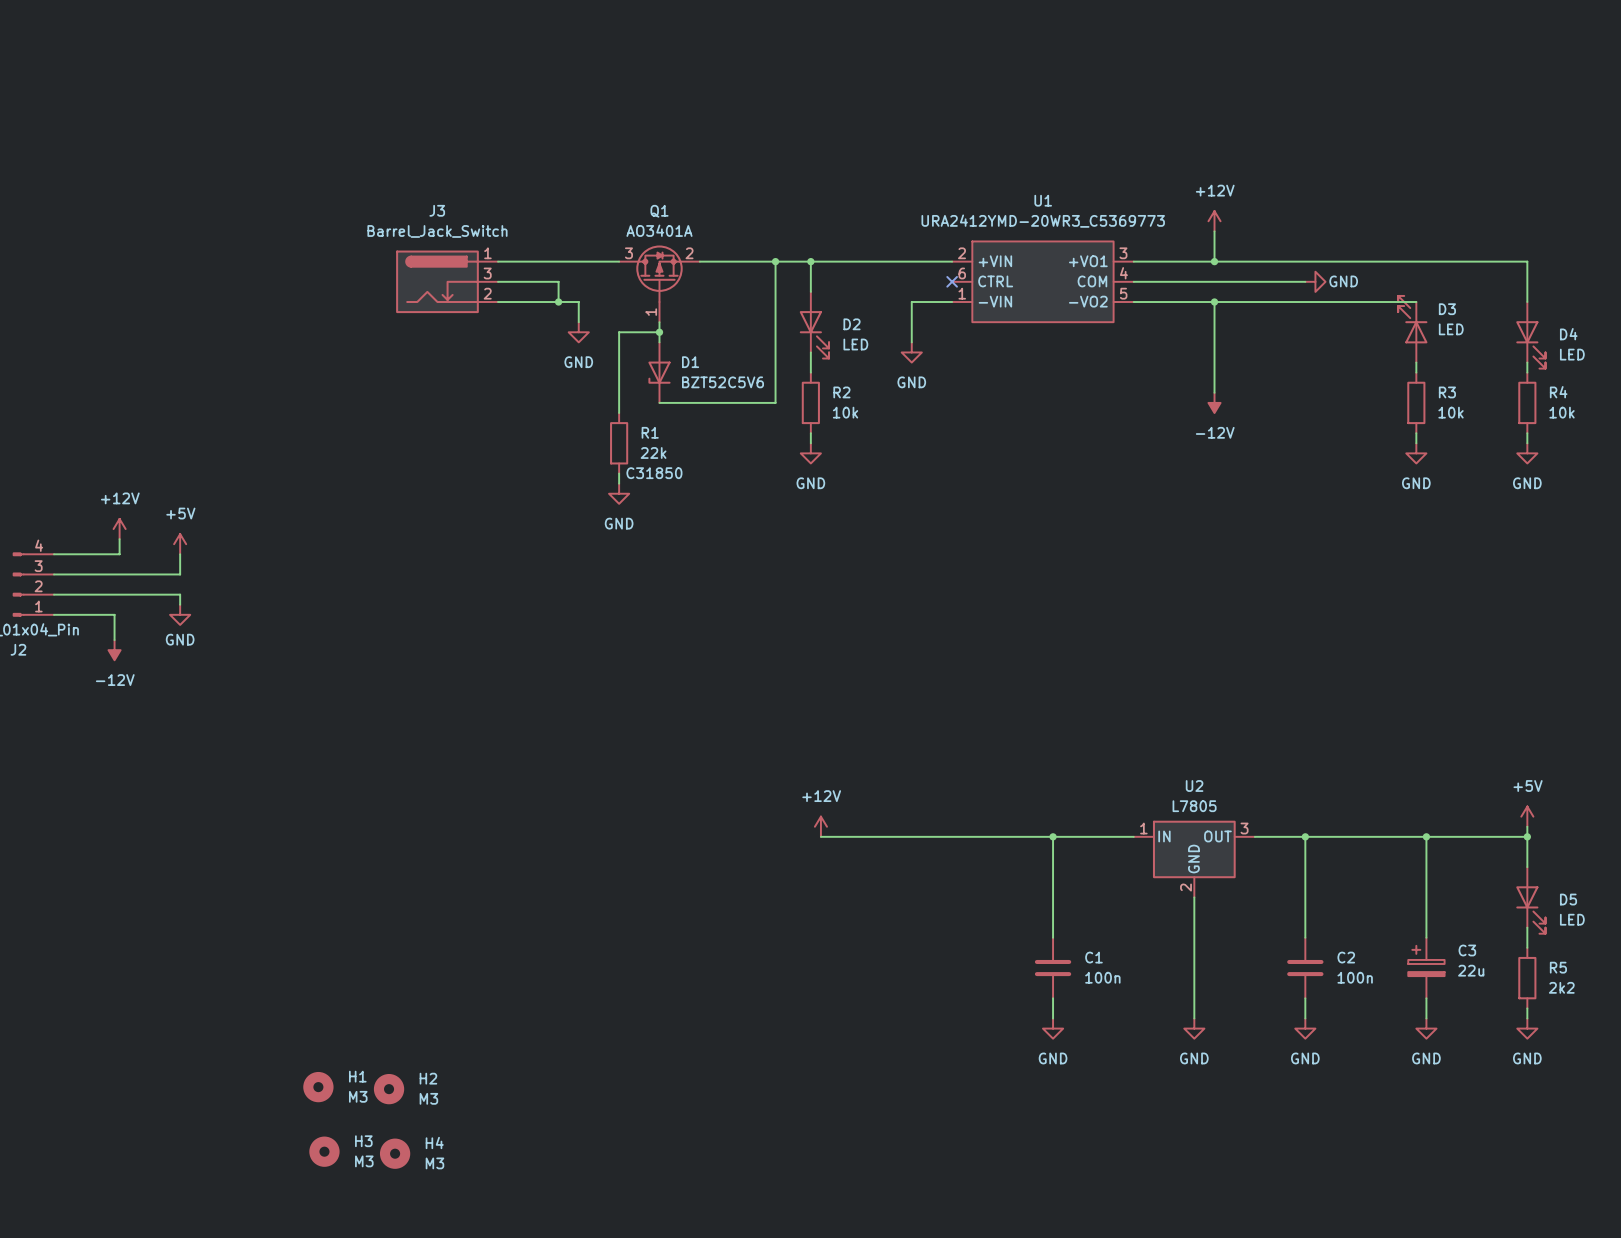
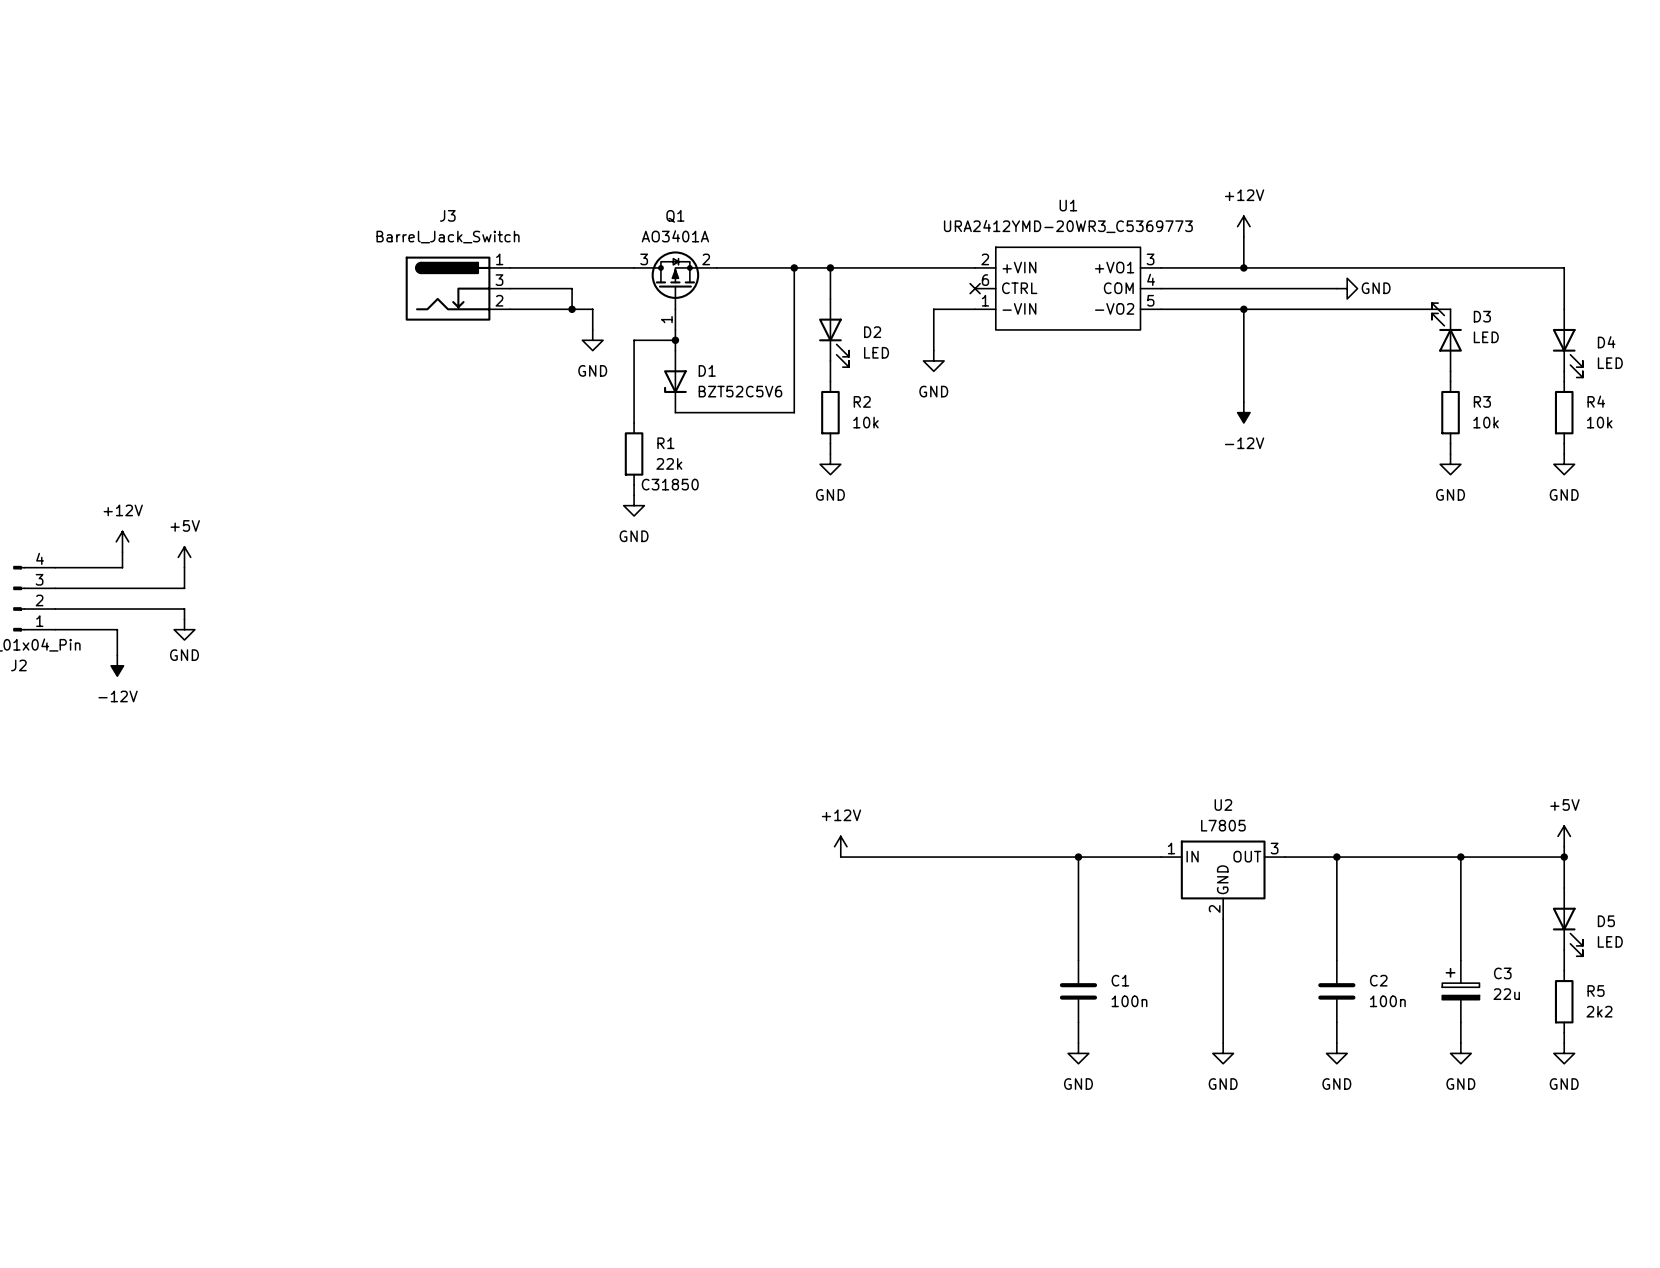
H1: M3 (318, 1087) -> none
H2: M3 (389, 1089) -> none
H3: M3 (324, 1151) -> none
H4: M3 (395, 1153) -> none

